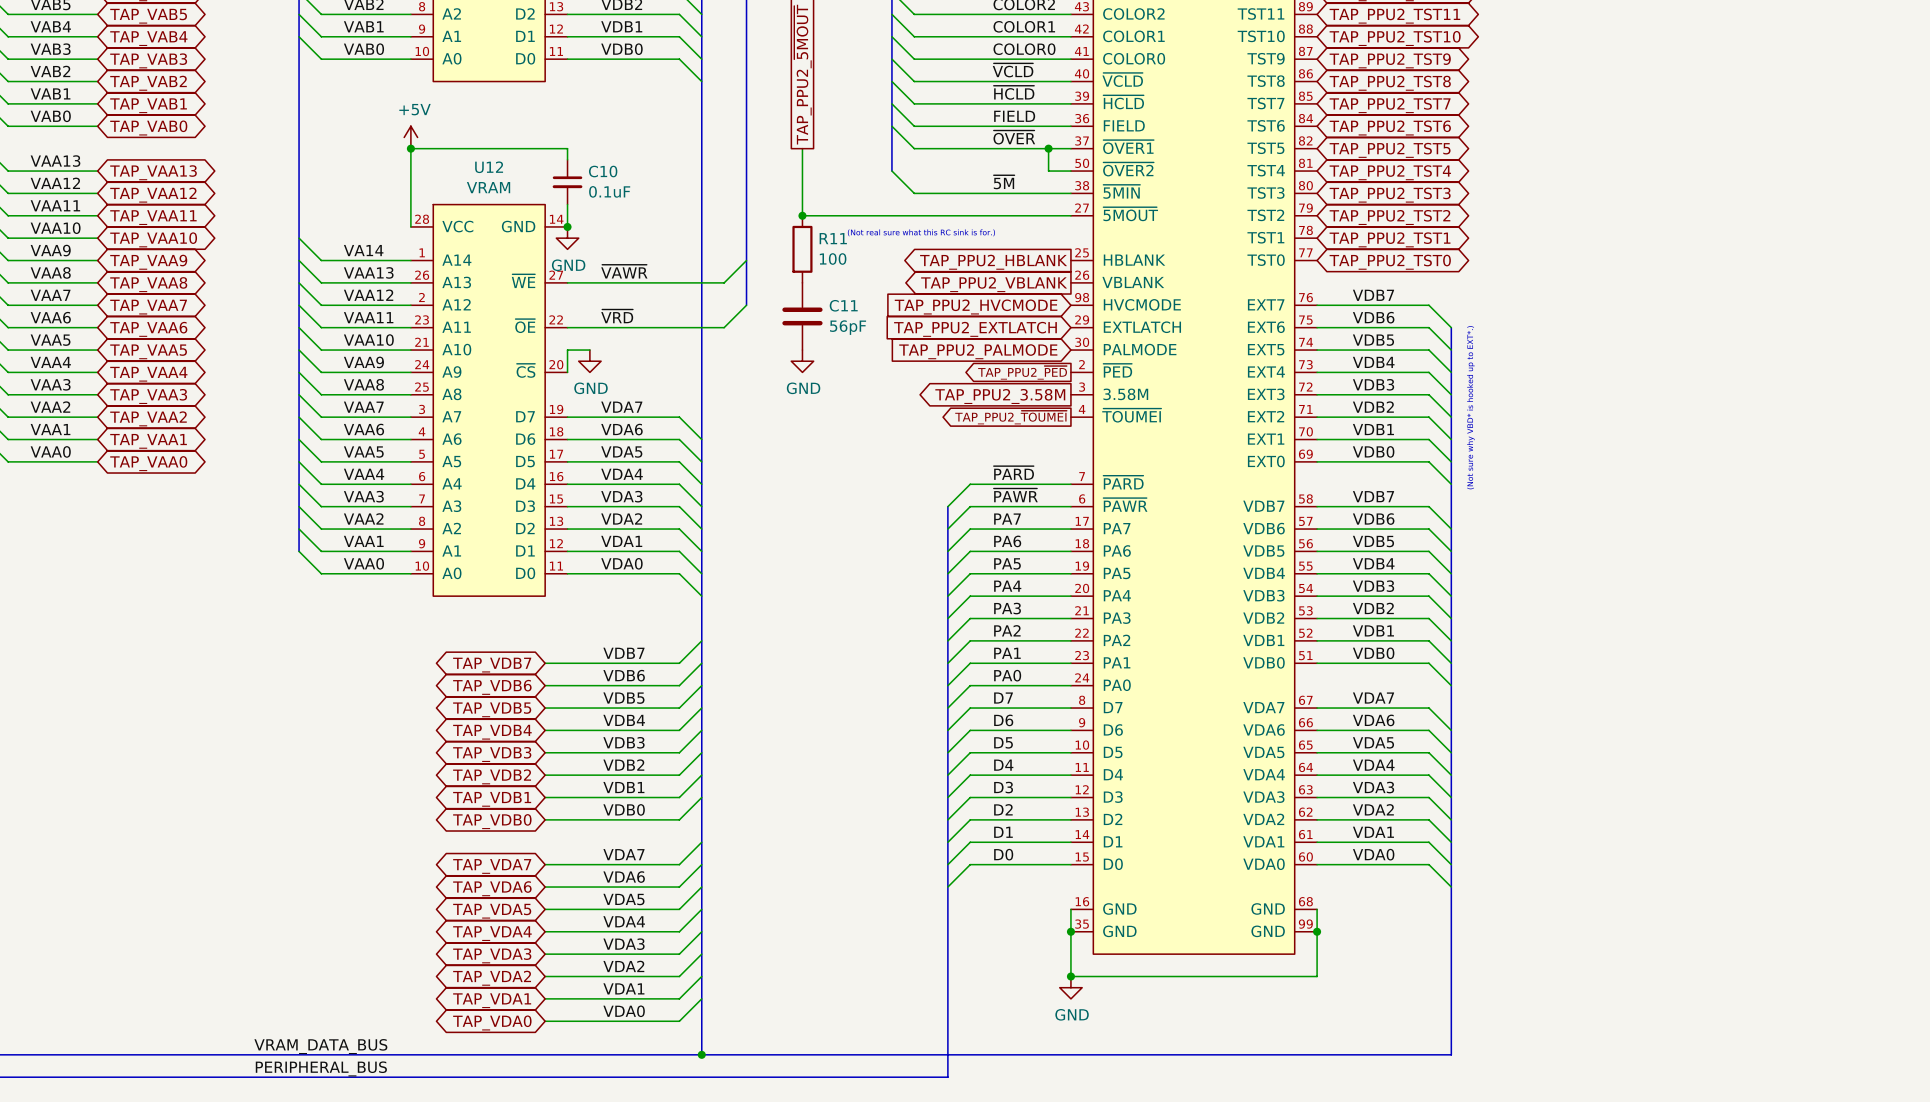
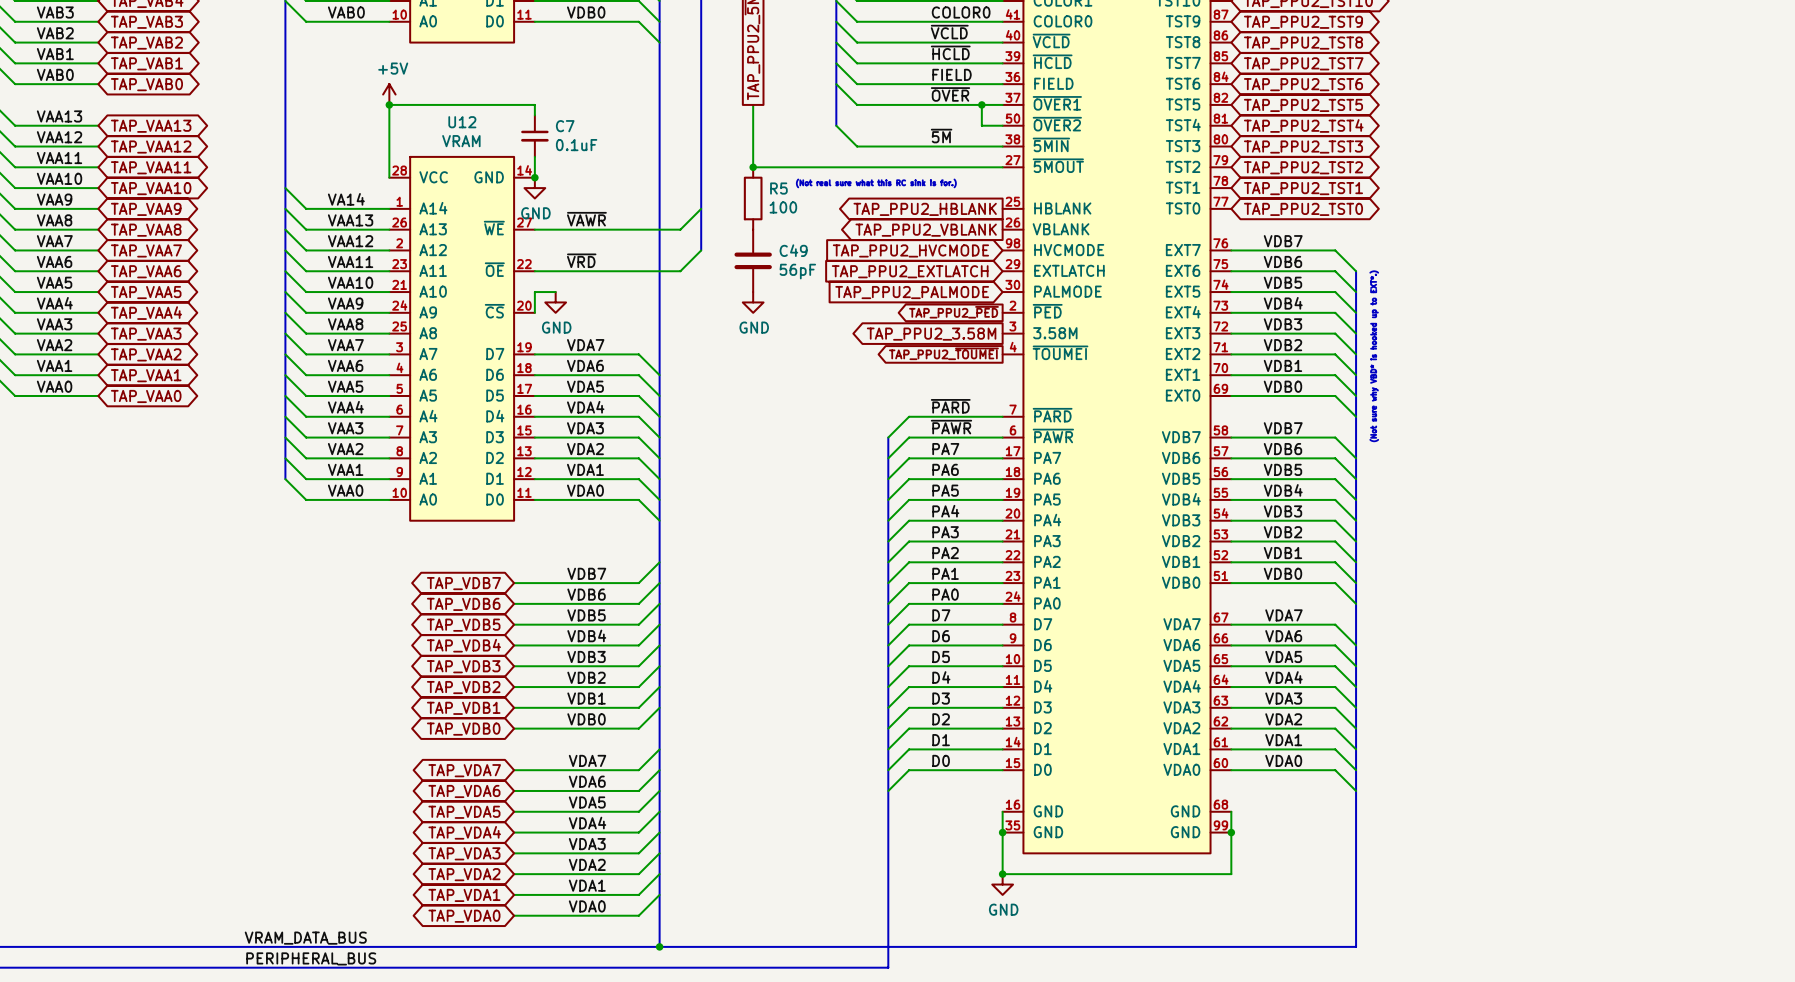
C10 name: C10 (603, 171) -> C7 (565, 126)
R11 name: R11 (833, 238) -> R5 (778, 188)
C11 name: C11 (843, 305) -> C49 (793, 250)

